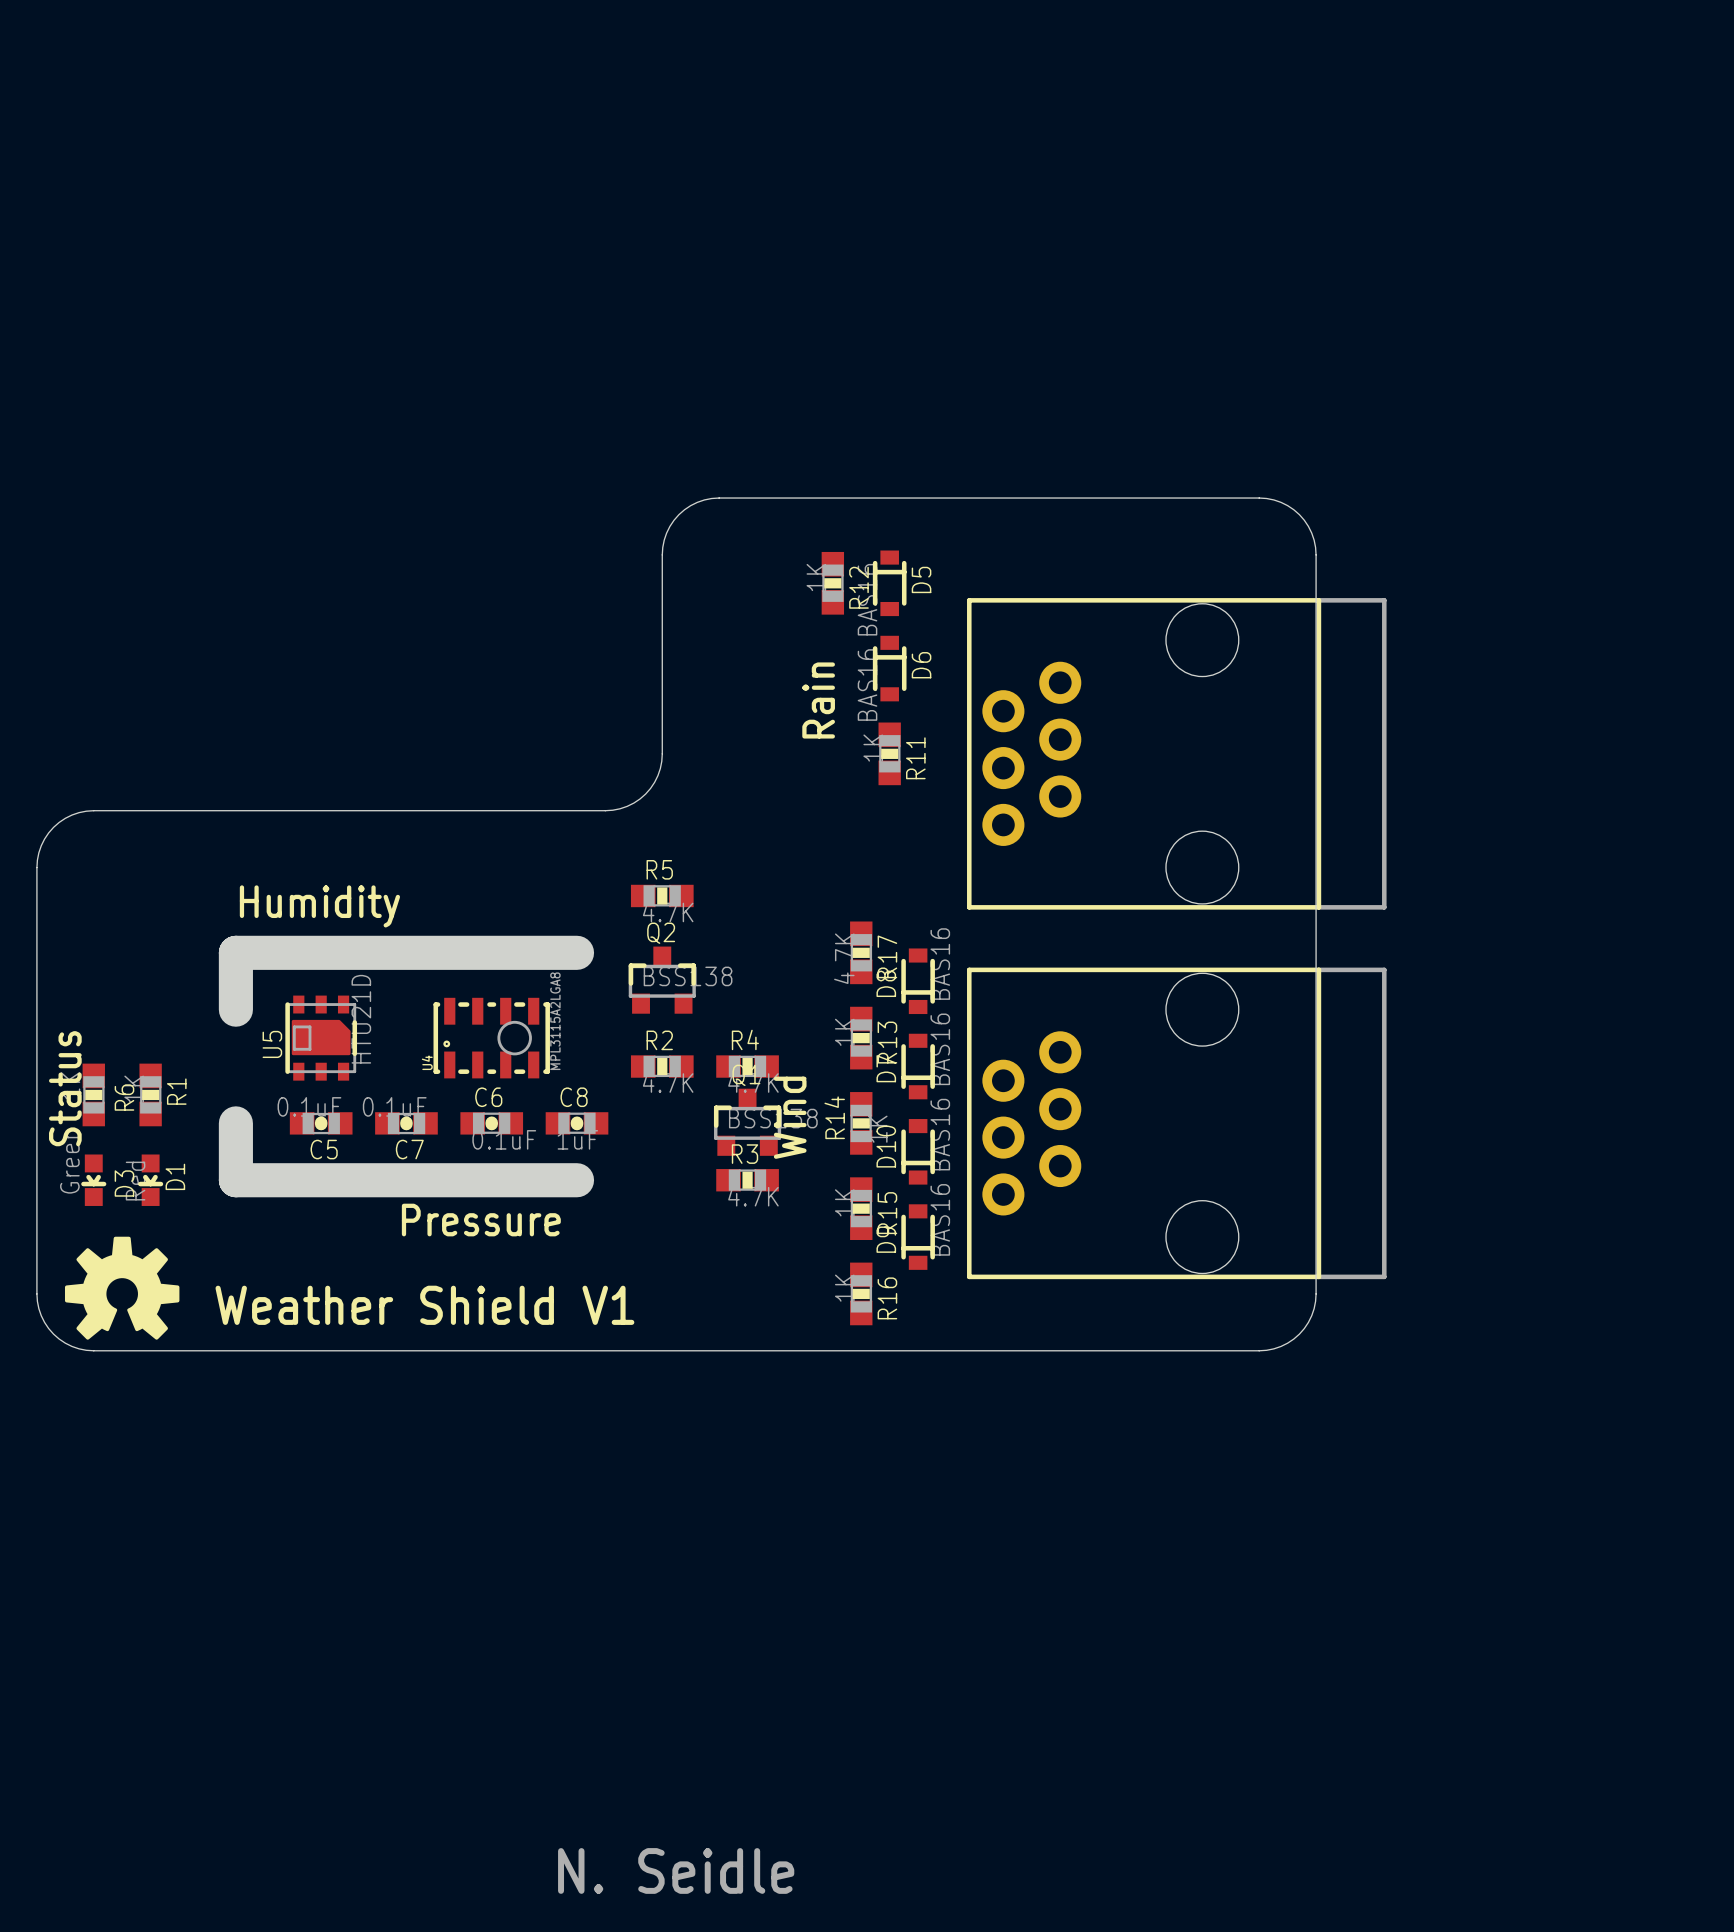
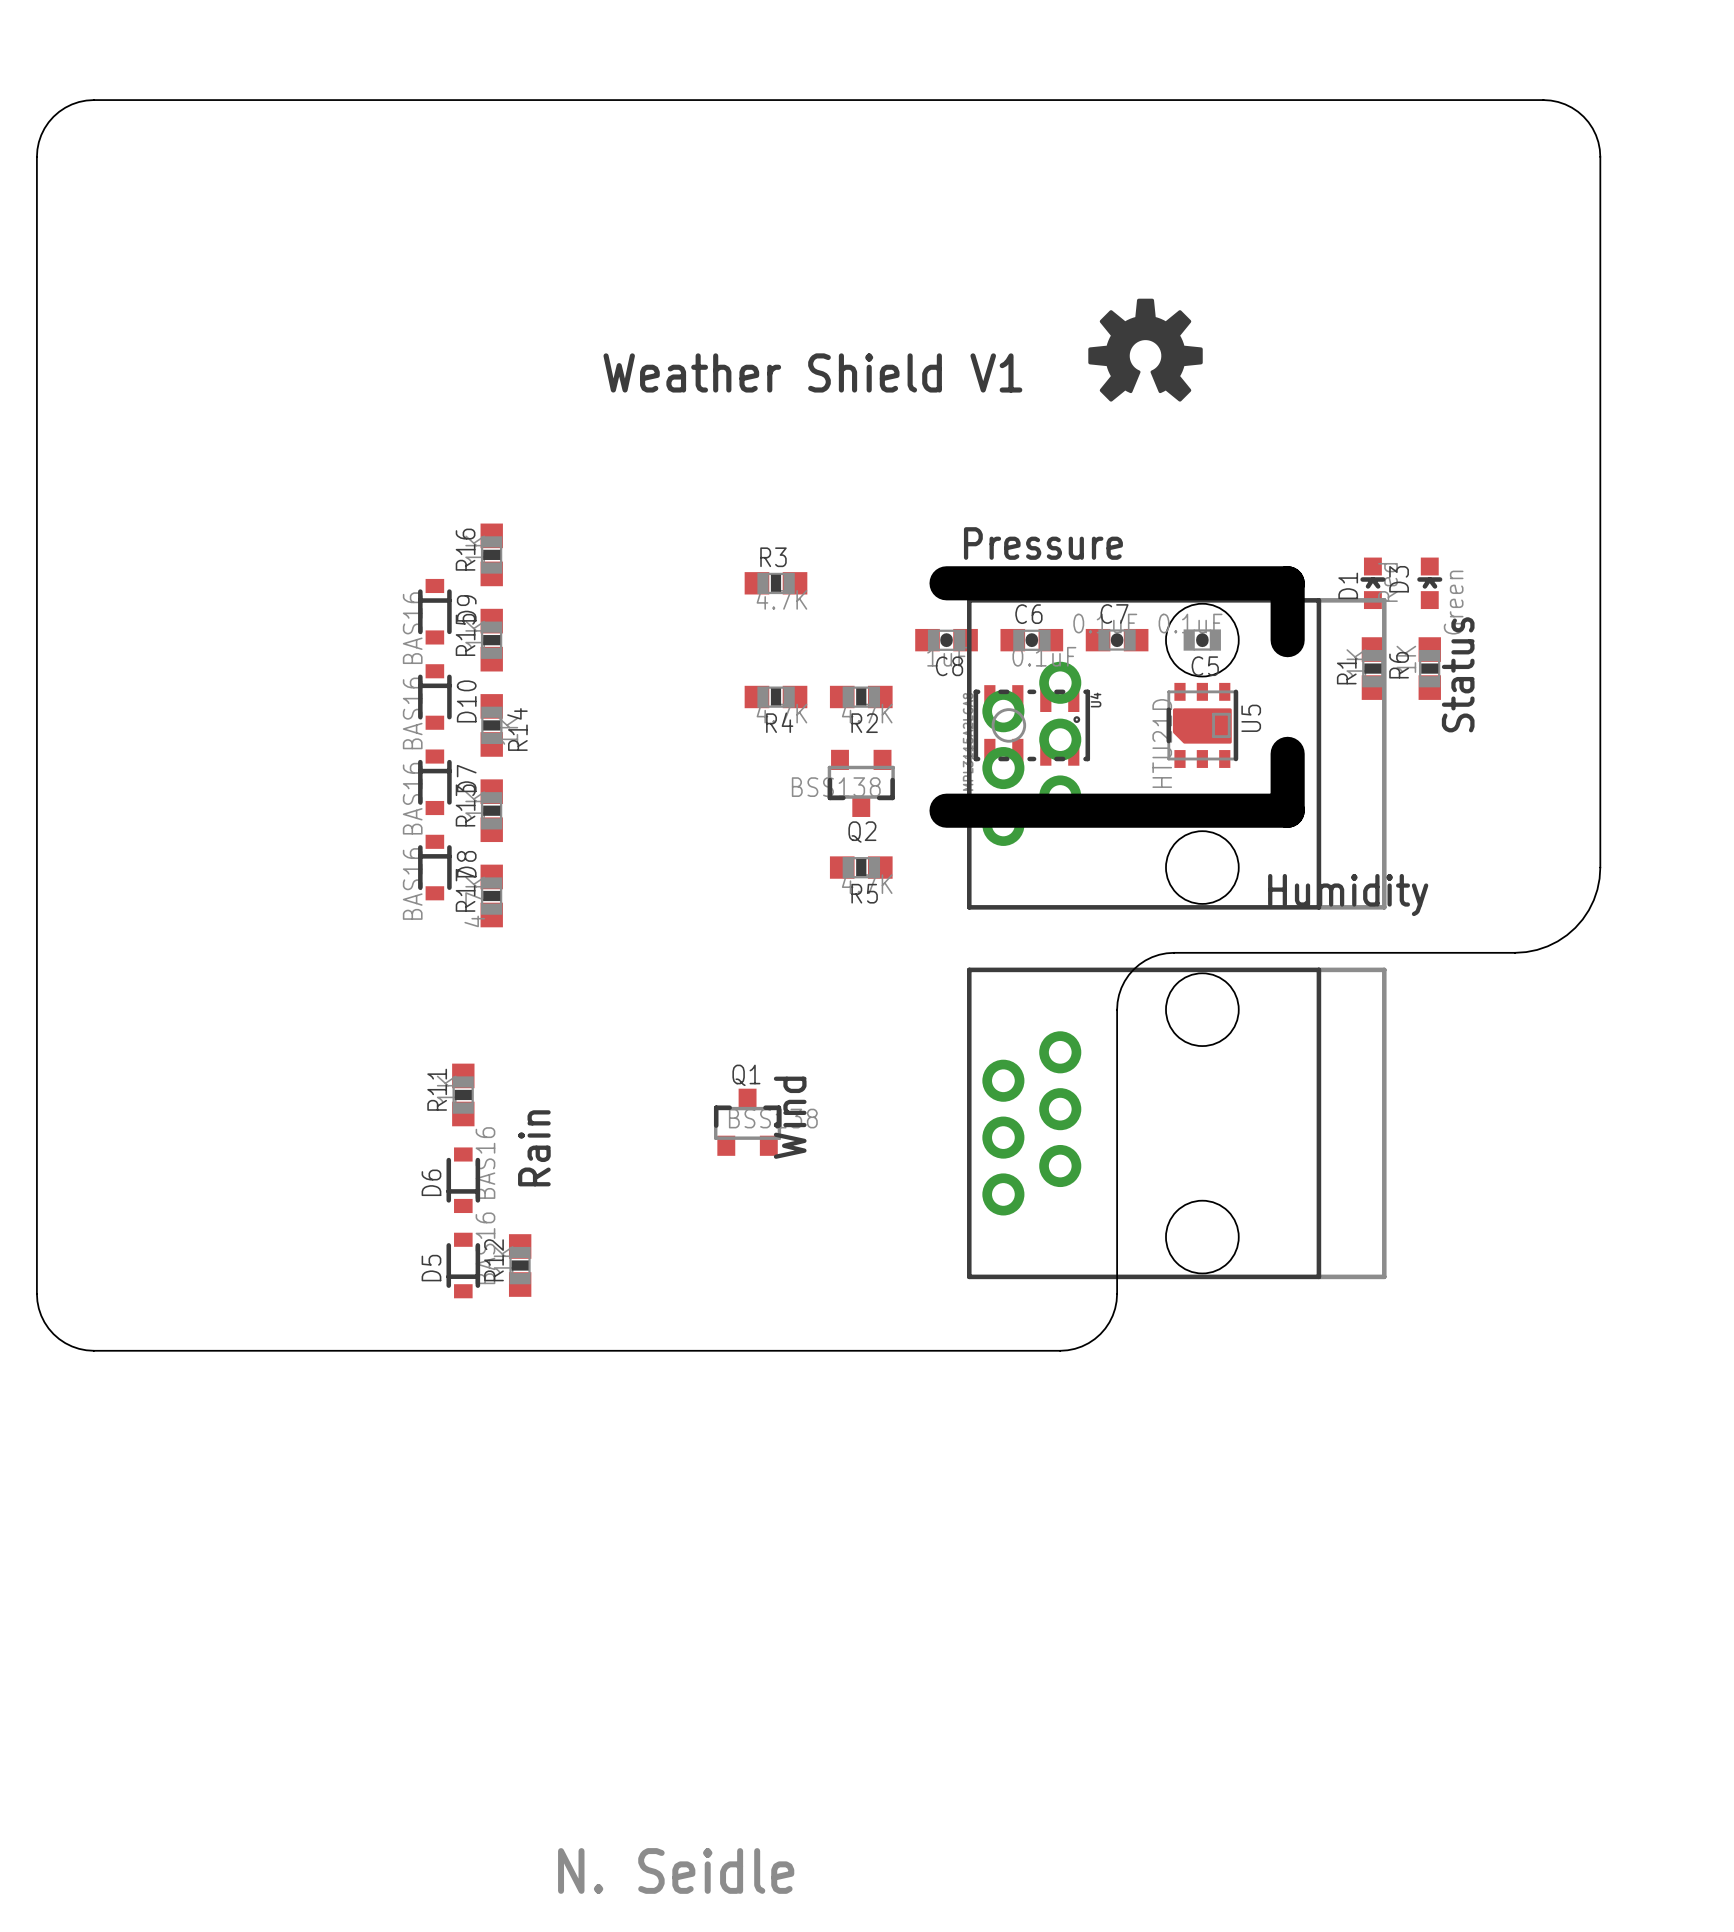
drawing: none -> [1088, 298, 1203, 402]
text: none -> Weather Shield V1 (812, 372)
text: none -> Pressure (1043, 543)
R12 position: (832, 583) -> (520, 1265)
D5 rotation: 0° (889, 583) -> 180° (463, 1265)
D5 position: (889, 583) -> (463, 1265)
board edge: none -> (946, 583) (1287, 583) (1287, 640)
R12 name position: R12 (858, 587) -> R12 (494, 1260)
D6 rotation: 0° (889, 668) -> 180° (463, 1180)
D6 position: (889, 668) -> (463, 1180)
text: none -> Status (1458, 674)
text position: Rain (818, 700) -> Rain (534, 1148)
R11 position: (889, 753) -> (463, 1094)
board edge: none -> (1287, 753) (1287, 810) (946, 810)
R11 name position: R11 (915, 758) -> R11 (437, 1089)
board edge: (36, 867) (41, 845) (53, 827) (72, 815) (86, 811) (605, 810) (620, 808) (633, 803) (650, 788) (657, 775) (661, 761) (662, 554) (664, 540) (669, 526) (678, 514) (690, 505) (704, 499) (719, 498) (1259, 498) (1280, 502) (1293, 509) (1304, 520) (1314, 540) (1316, 554) (1316, 1293) (1314, 1308) (1308, 1322) (1299, 1334) (1280, 1346) (1266, 1350) (1060, 1350) -> (36, 867) (36, 156) (38, 142) (44, 128) (53, 116) (65, 107) (79, 102) (93, 100) (1543, 100) (1565, 104) (1578, 111) (1588, 122) (1598, 142) (1600, 156) (1600, 867) (1593, 900) (1582, 919) (1566, 935) (1547, 946) (1526, 952) (1173, 952) (1159, 954) (1139, 964) (1124, 981) (1117, 1002) (1117, 1293) (1115, 1308) (1105, 1328) (1094, 1339) (1074, 1348) (1060, 1350)
R5 name position: R5 (659, 869) -> R5 (864, 893)
R5 position: (662, 895) -> (861, 867)
text: none -> Humidity (1348, 895)
text: Humidity (319, 906) -> none
board edge: (577, 952) (235, 952) (235, 1009) -> none
R17 position: (861, 952) -> (491, 895)
R17 name position: R17 (887, 956) -> R17 (465, 890)
Q2 rotation: 0° (662, 980) -> 180° (861, 783)
Q2 position: (662, 980) -> (861, 783)
D8 rotation: 0° (918, 981) -> 180° (434, 867)
D8 position: (918, 981) -> (434, 867)
U5 rotation: 0° (321, 1038) -> 180° (1202, 725)
U5 position: (321, 1038) -> (1202, 725)
U4 rotation: 0° (491, 1038) -> 180° (1031, 725)
U4 position: (491, 1038) -> (1031, 725)
R13 position: (861, 1038) -> (491, 810)
R4 name position: R4 (745, 1039) -> R4 (779, 722)
R2 name position: R2 (659, 1040) -> R2 (864, 723)
R13 name position: R13 (887, 1042) -> R13 (465, 805)
R2 position: (662, 1066) -> (861, 697)
R4 position: (747, 1066) -> (775, 697)
D7 rotation: 0° (918, 1066) -> 180° (434, 782)
D7 position: (918, 1066) -> (434, 782)
text: Status (65, 1088) -> none
R1 name position: R1 (176, 1091) -> R1 (1346, 671)
R6 position: (93, 1094) -> (1429, 668)
R1 position: (150, 1094) -> (1372, 668)
R6 name position: R6 (124, 1097) -> R6 (1399, 665)
C8 name position: C8 (574, 1097) -> C8 (949, 666)
R14 name position: R14 (834, 1117) -> R14 (517, 729)
board edge: (235, 1123) (235, 1180) (577, 1180) -> none
C5 position: (321, 1123) -> (1202, 640)
C7 position: (406, 1123) -> (1117, 640)
C6 position: (491, 1123) -> (1031, 640)
C8 position: (577, 1123) -> (946, 640)
R14 position: (861, 1123) -> (491, 725)
C7 name position: C7 (409, 1149) -> C7 (1114, 614)
D10 rotation: 0° (918, 1151) -> 180° (434, 697)
D10 position: (918, 1151) -> (434, 697)
D3 rotation: 0° (93, 1180) -> 180° (1429, 583)
D3 position: (93, 1180) -> (1429, 583)
D1 rotation: 0° (150, 1180) -> 180° (1372, 583)
D1 position: (150, 1180) -> (1372, 583)
R3 position: (747, 1180) -> (775, 583)
R15 position: (861, 1208) -> (491, 640)
R15 name position: R15 (887, 1213) -> R15 (465, 634)
text: Pressure (481, 1220) -> none
drawing: [64, 1236, 180, 1340] -> none
D9 rotation: 0° (918, 1237) -> 180° (434, 611)
D9 position: (918, 1237) -> (434, 611)
R16 position: (861, 1293) -> (491, 554)
R16 name position: R16 (887, 1298) -> R16 (465, 549)
text: Weather Shield V1 (424, 1305) -> none

